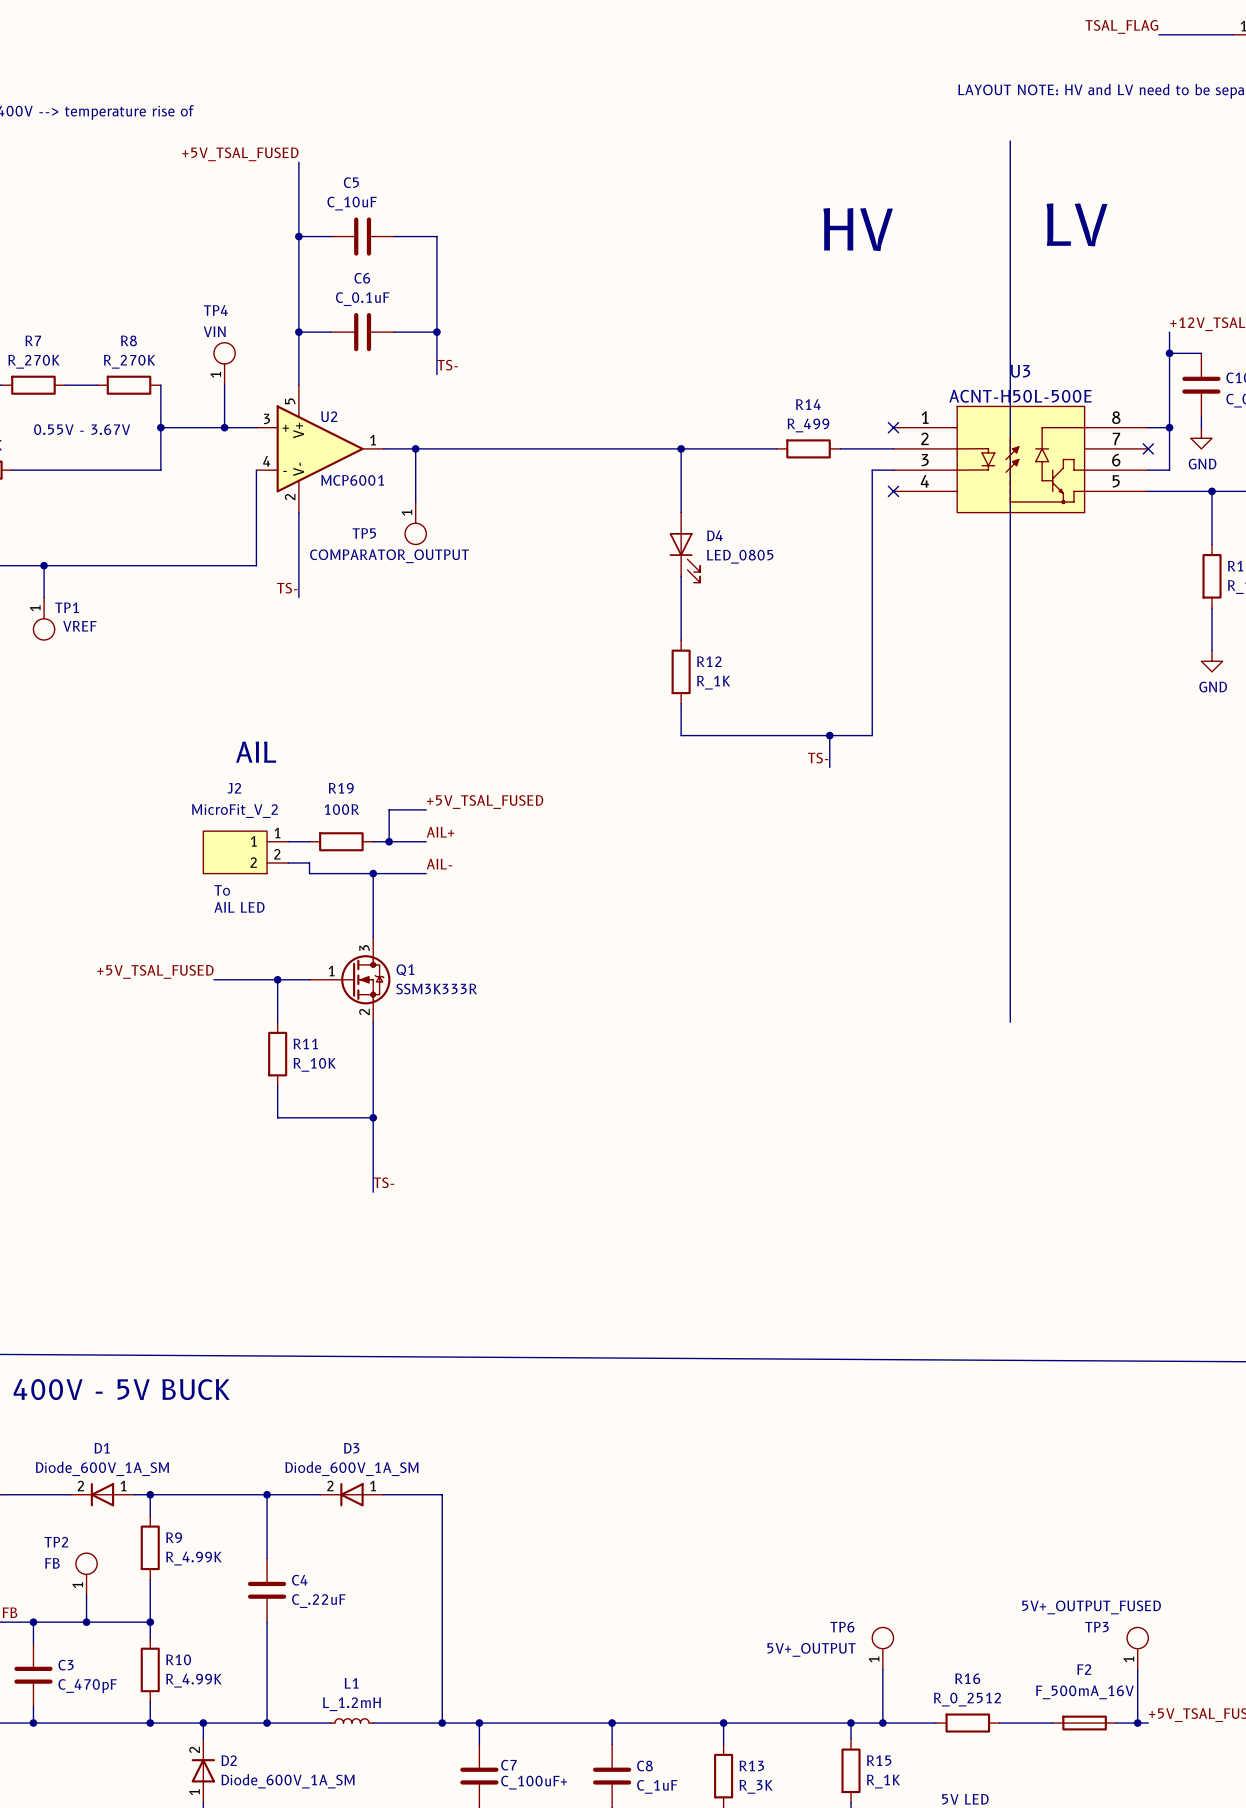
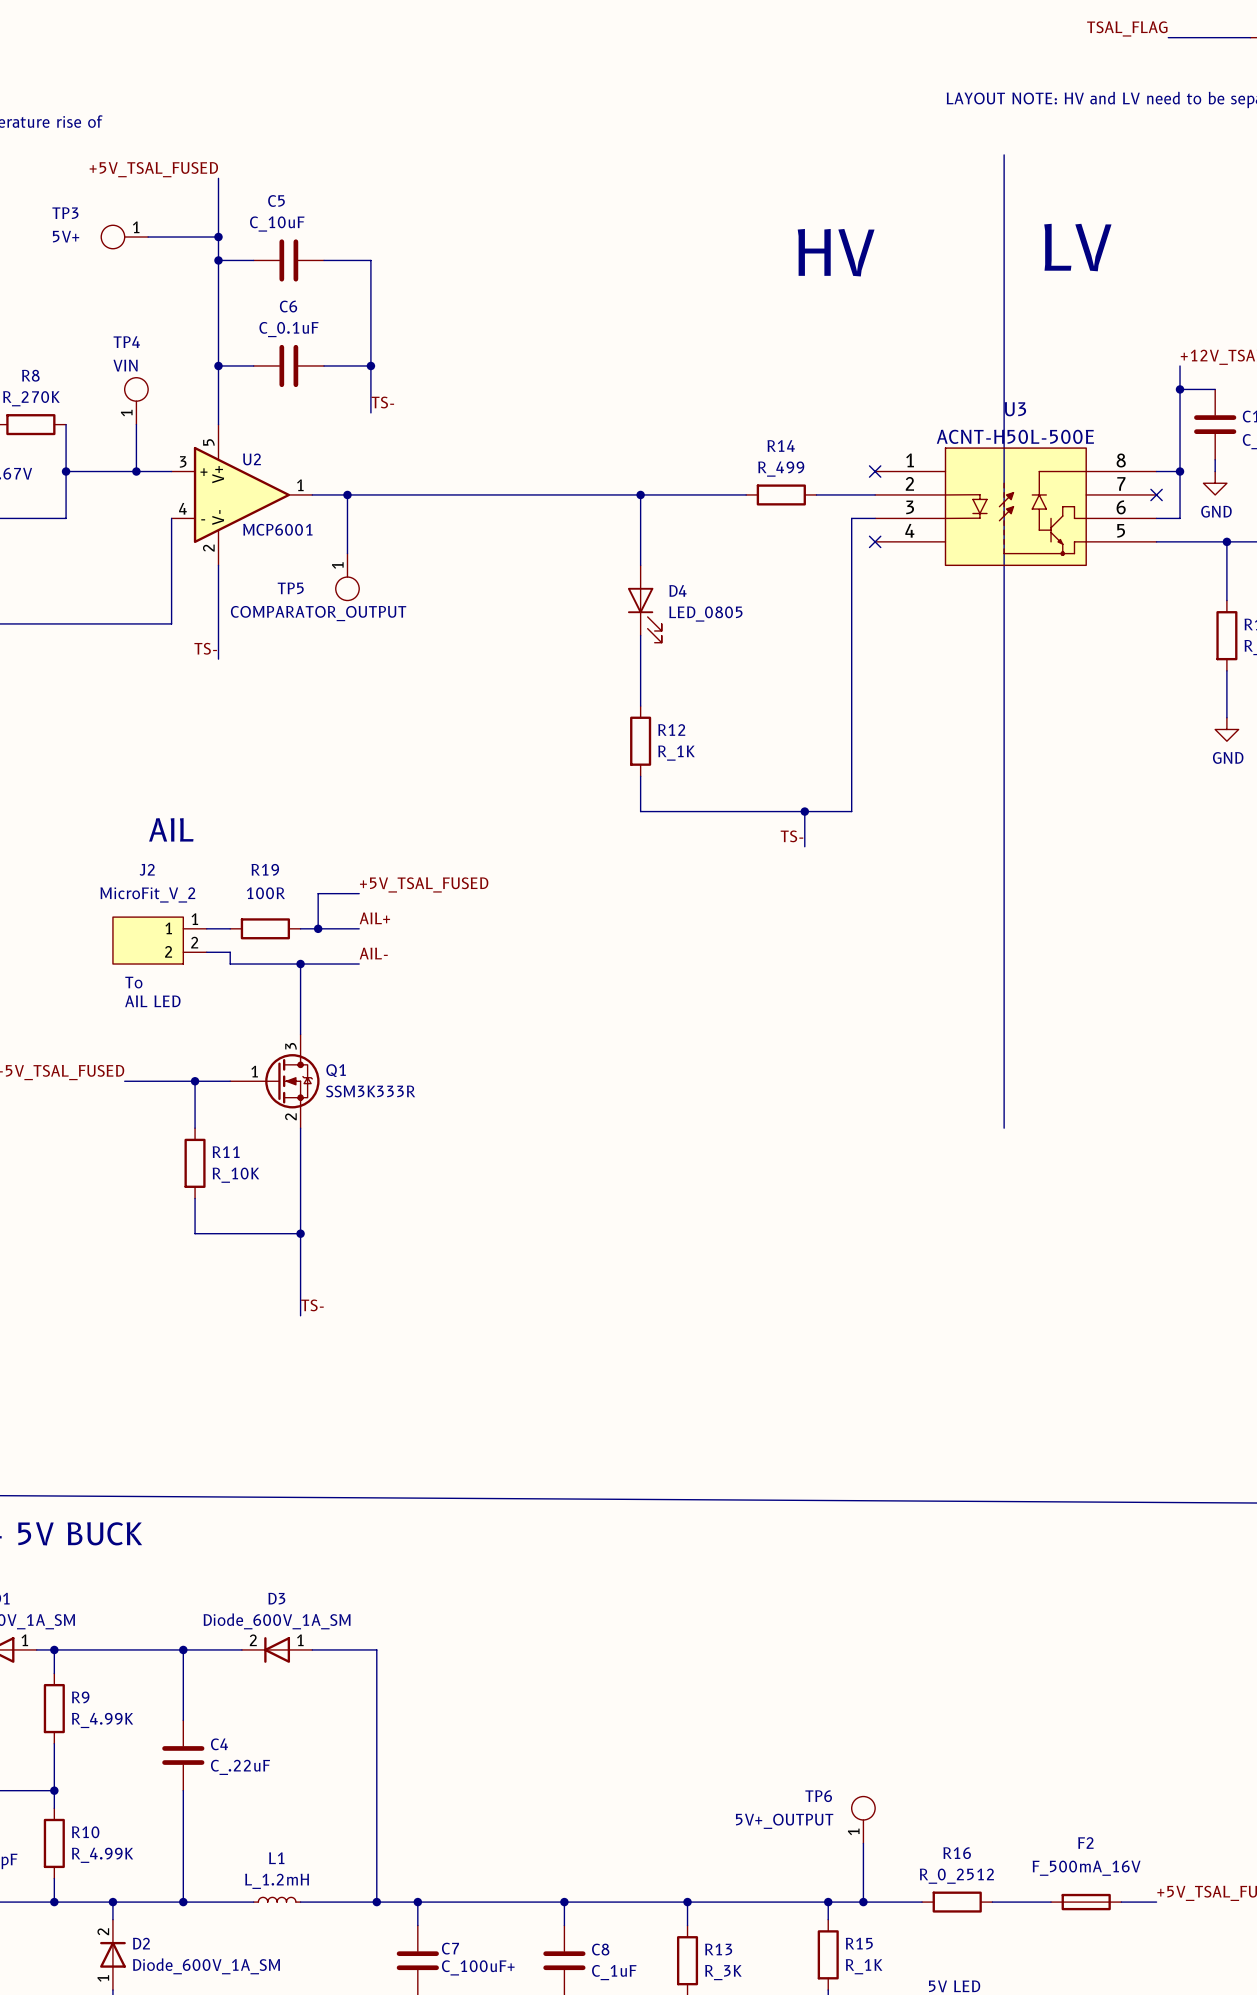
wire: none -> (148, 237) (218, 237)
junction: none -> (218, 237)
TP3 value: 5V+_OUTPUT_FUSED (1091, 1607) -> 5V+ (66, 236)
TP3 name position: TP3 (1096, 1627) -> TP3 (65, 213)
TP3 rotation: 0° (1137, 1638) -> 90° counterclockwise (112, 237)
TP3 position: (1137, 1648) -> (124, 237)
wire: (1137, 1669) (1137, 1723) -> none
junction: (1137, 1723) -> none

